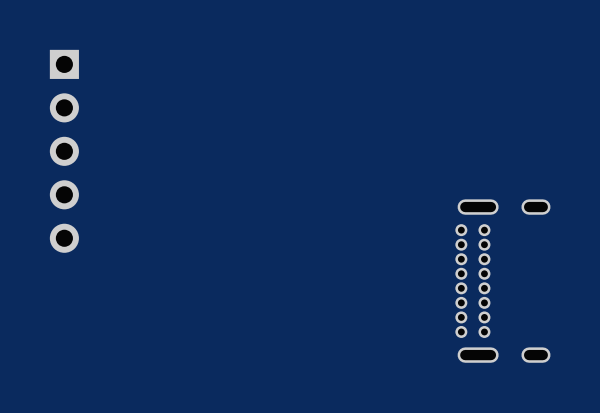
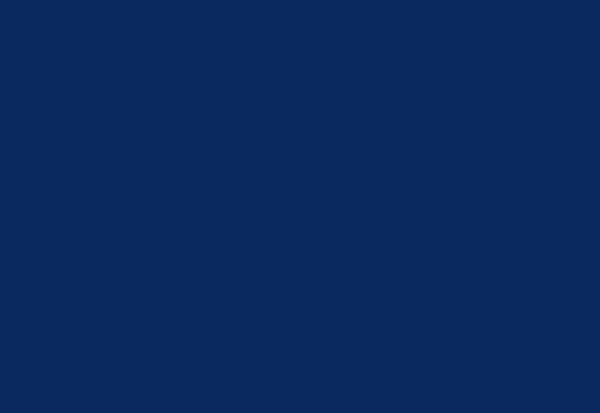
part: (64, 151) -> none
part: (502, 281) -> none

